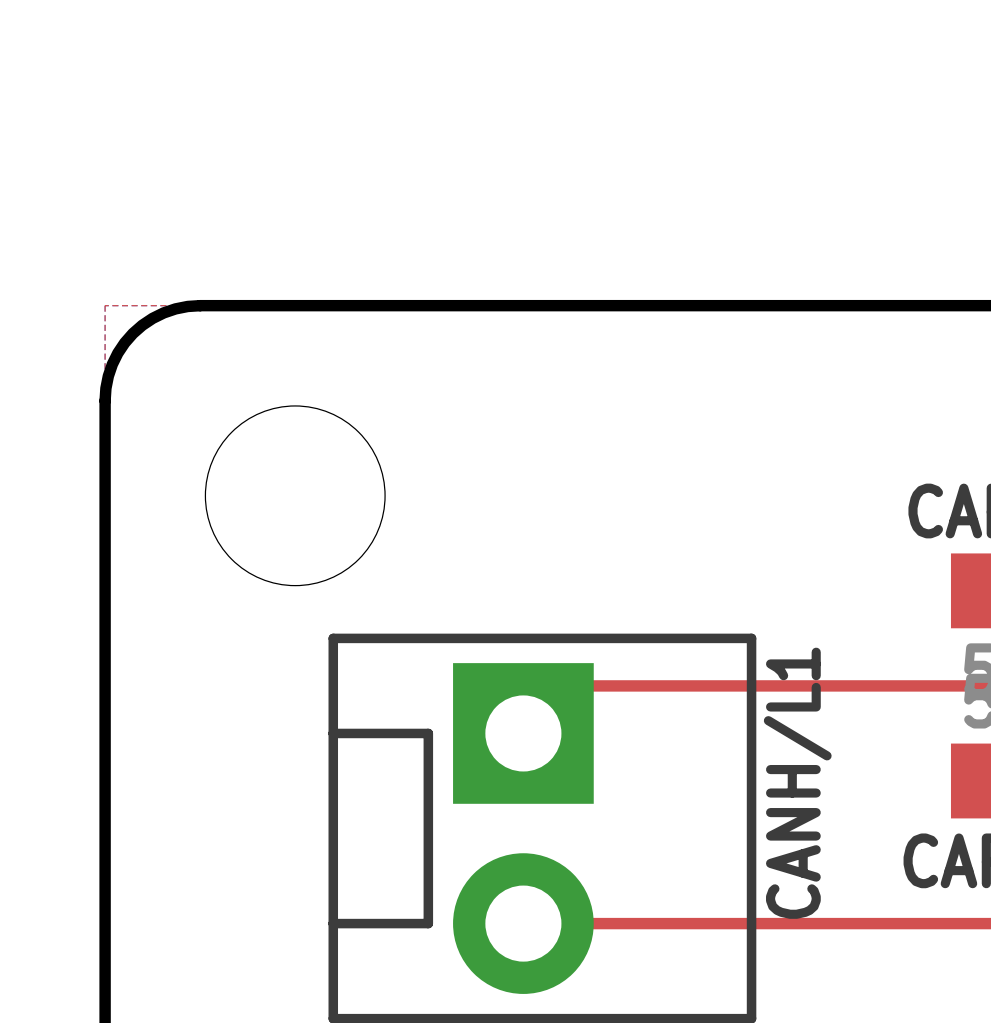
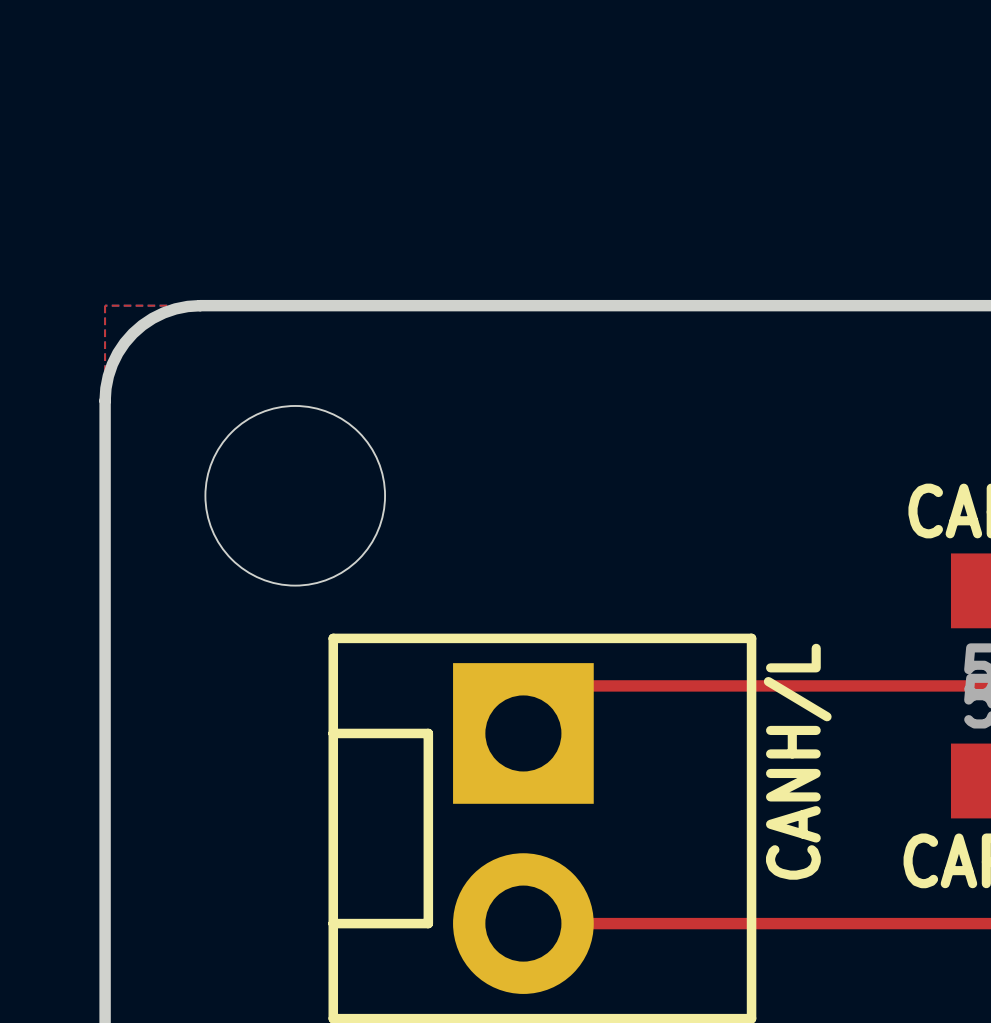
CANH/L1 name: CANH/L1 (797, 783) -> CANH/L (797, 761)

